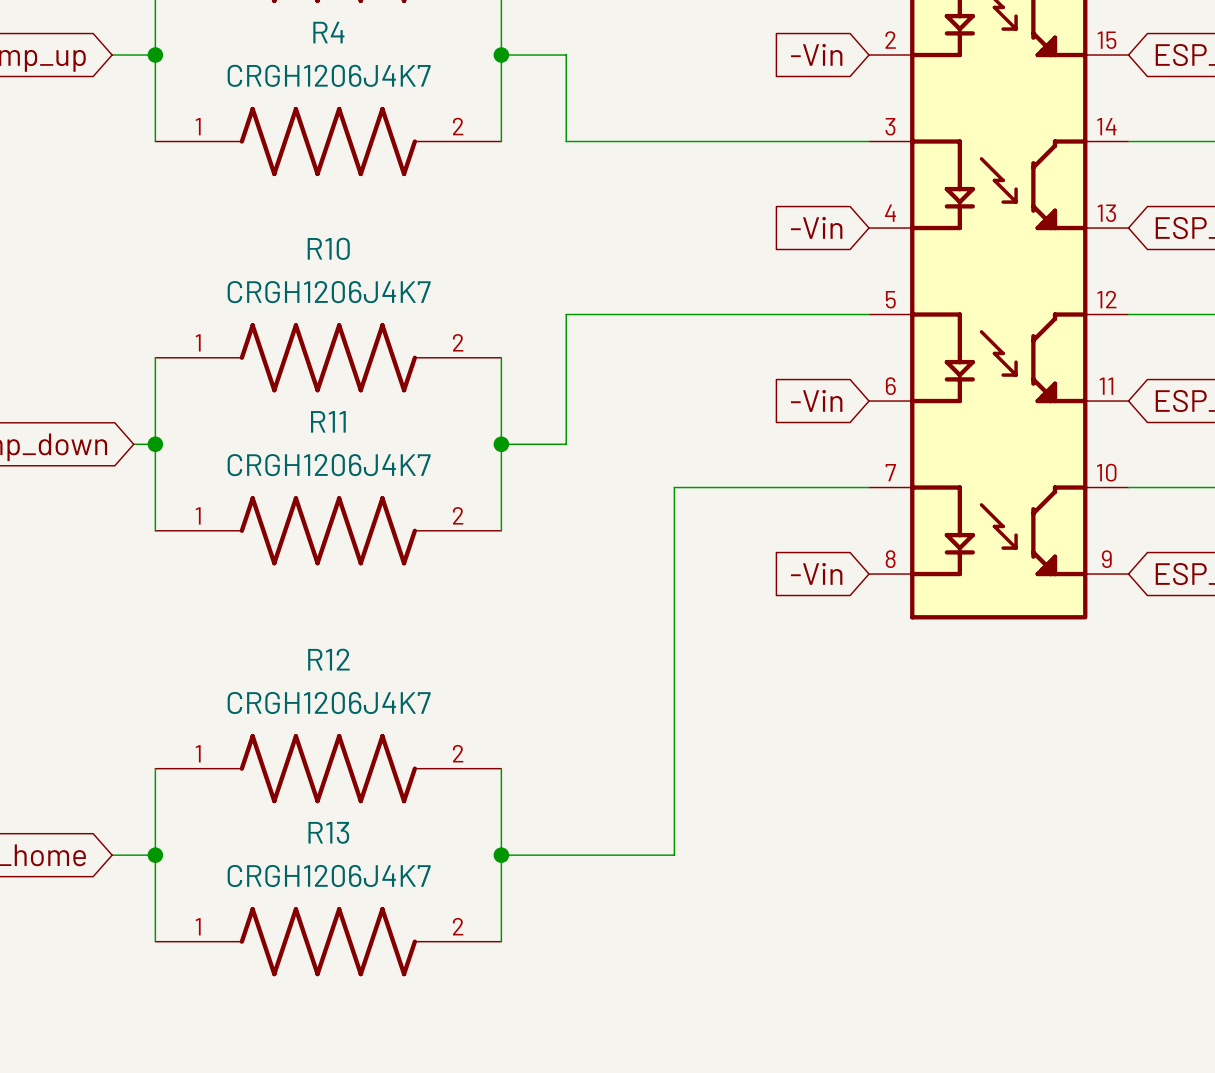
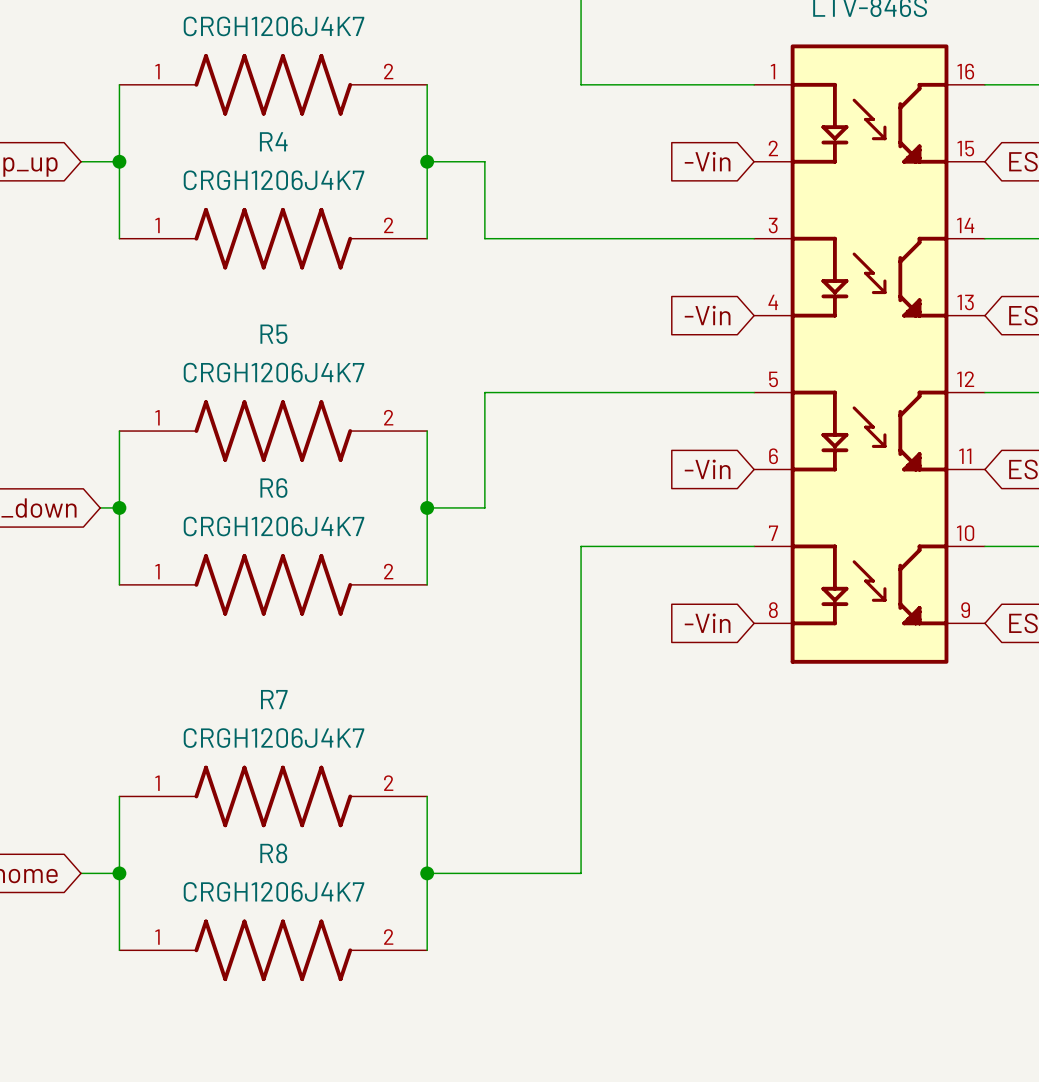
R10 name: R10 (328, 248) -> R5 (273, 334)
R11 name: R11 (328, 421) -> R6 (273, 487)
R12 name: R12 (328, 659) -> R7 (274, 699)
R13 name: R13 (328, 832) -> R8 (273, 853)

